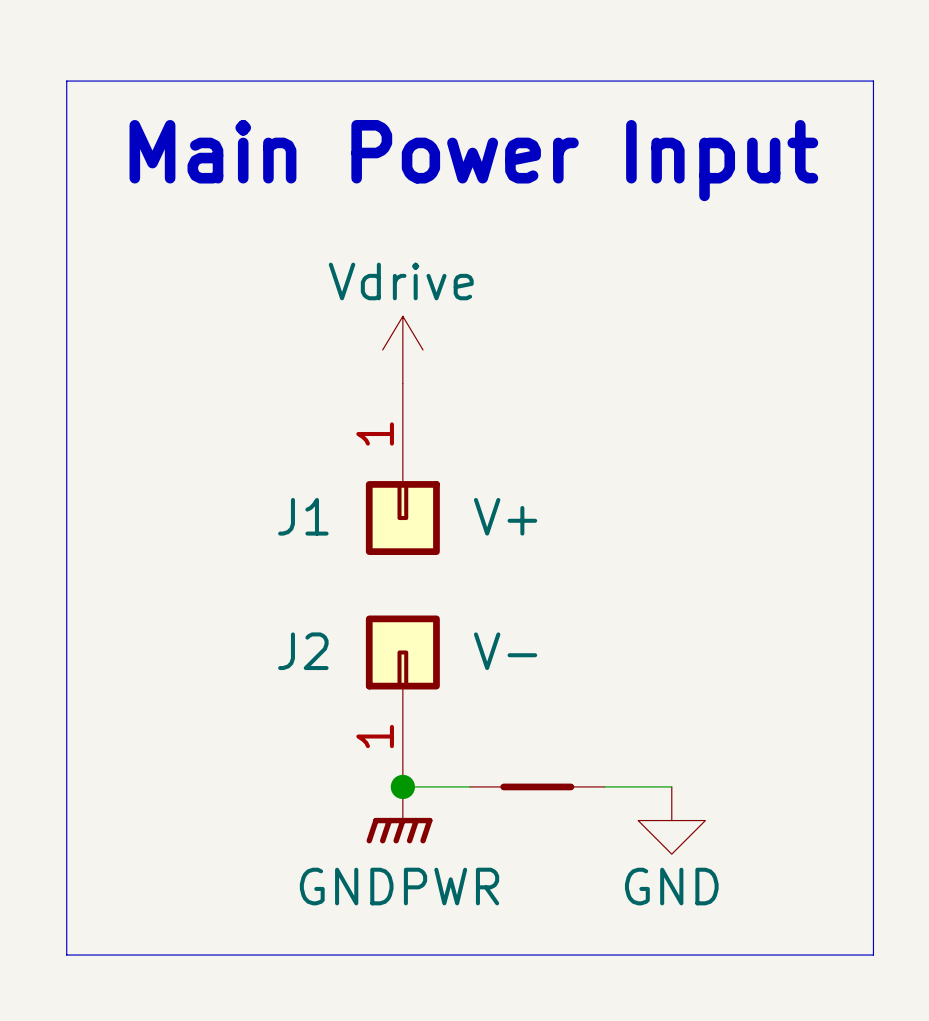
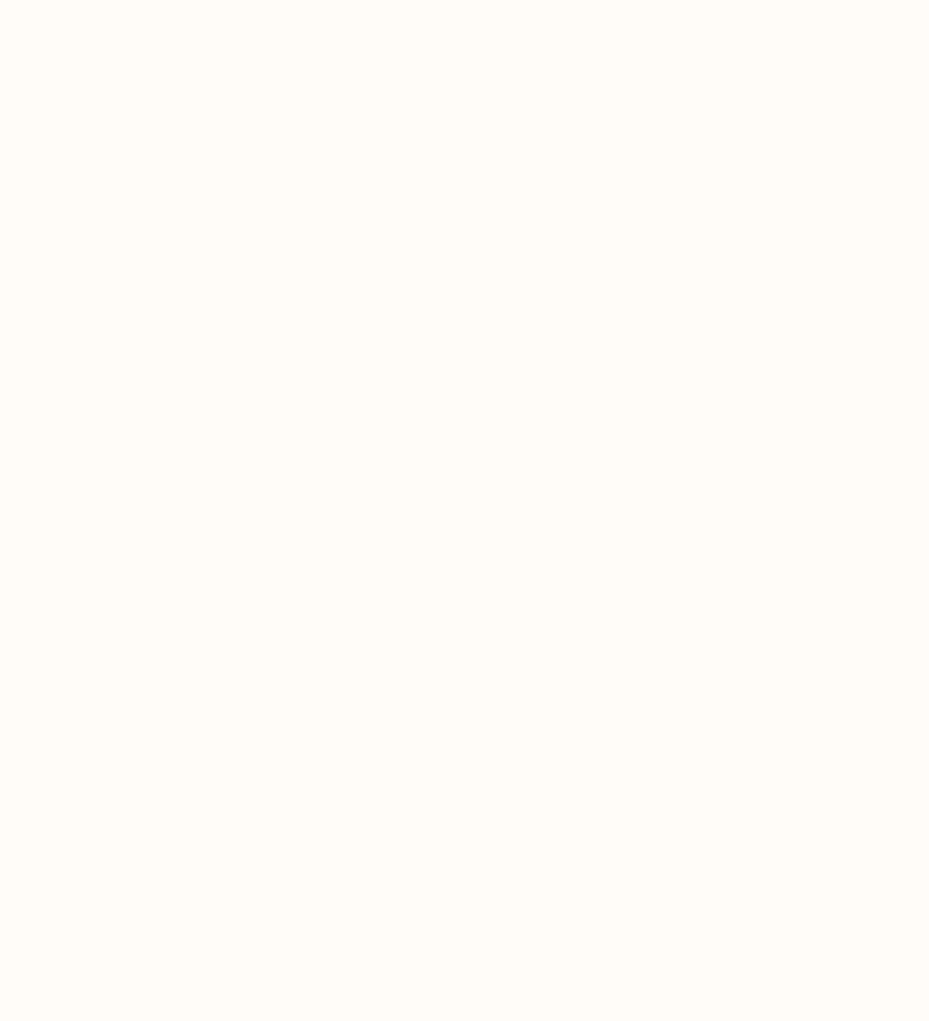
line: (66, 81) (873, 81) (873, 955) (66, 955) (66, 81) -> none
text: Main Power Input (473, 160) -> none
power symbol: Vdrive (402, 349) -> none
J1: V+ (402, 469) -> none
J2: V- (402, 701) -> none
wire: (402, 786) (470, 786) -> none
junction: (402, 786) -> none
part: (537, 786) -> none
wire: (604, 786) (671, 786) -> none
power symbol: GNDPWR (399, 815) -> none
power symbol: GND (671, 820) -> none

